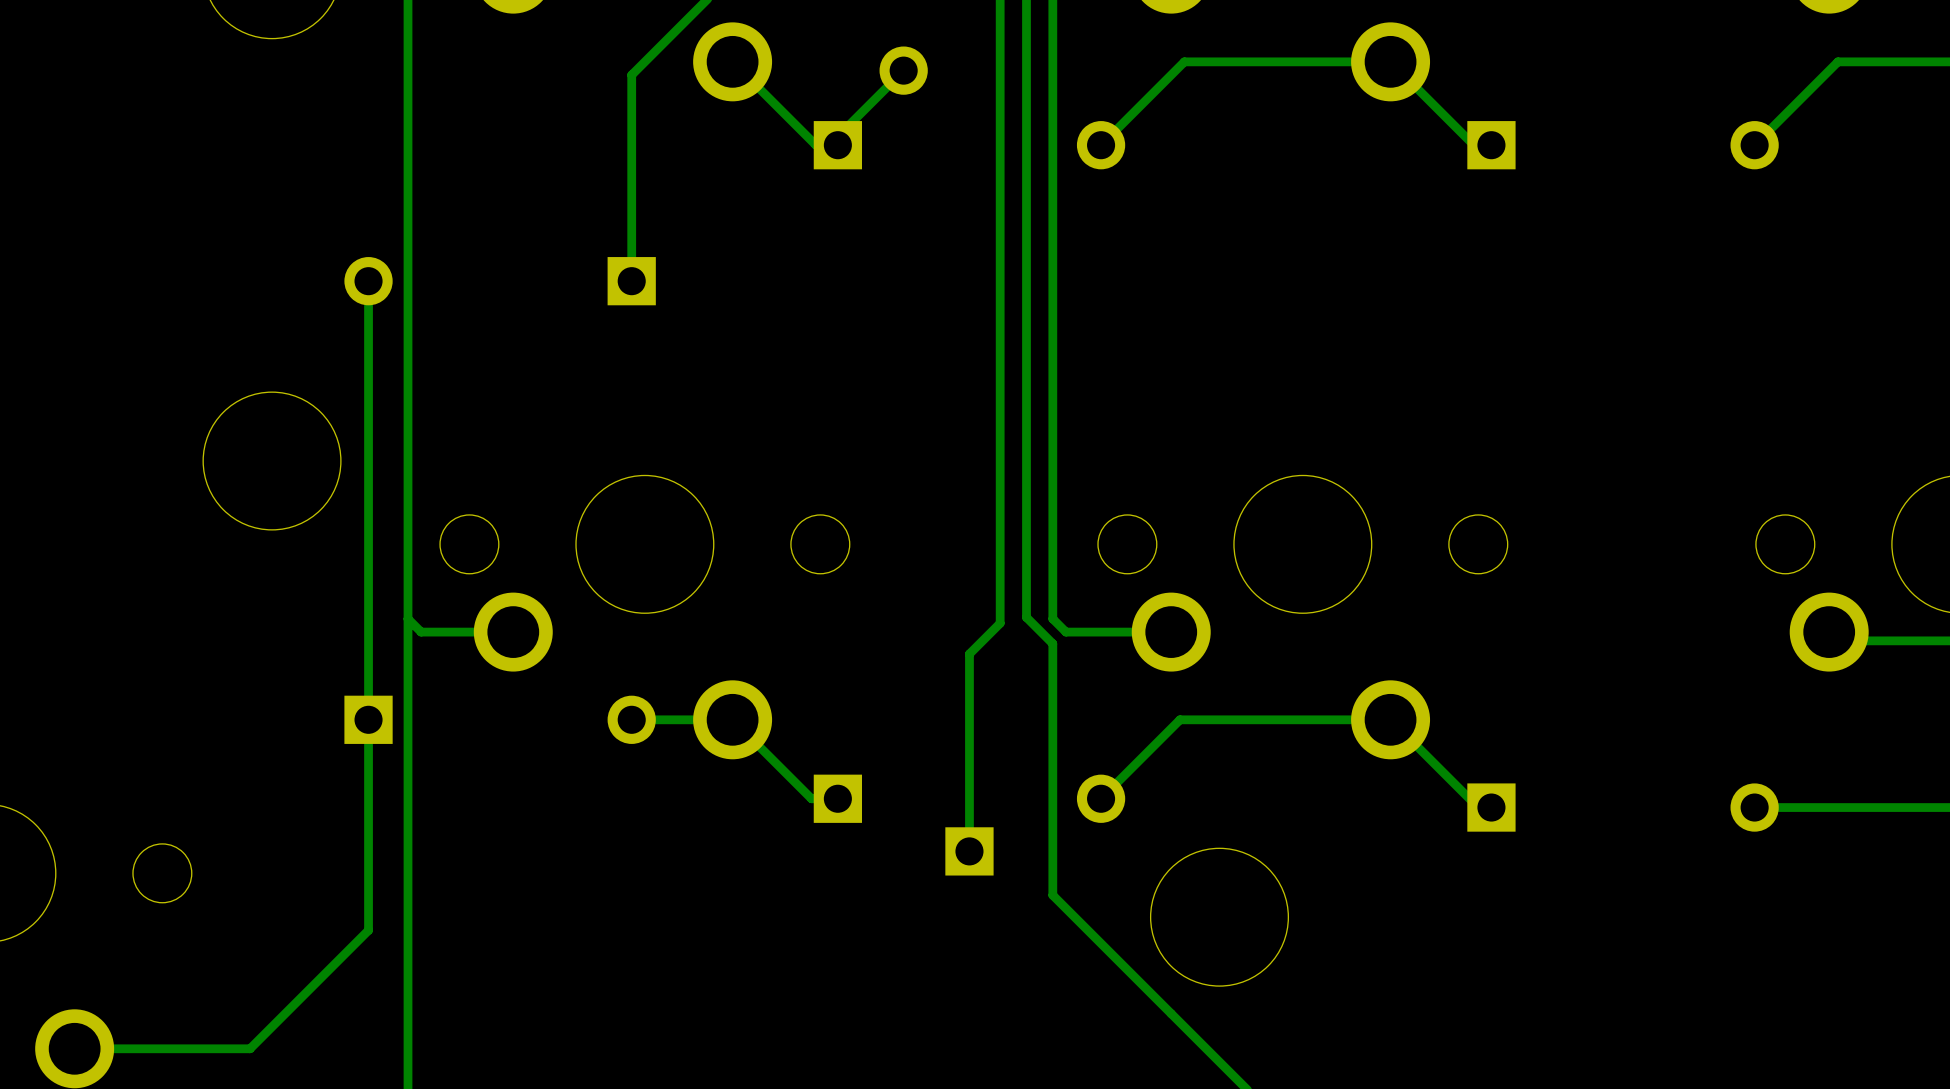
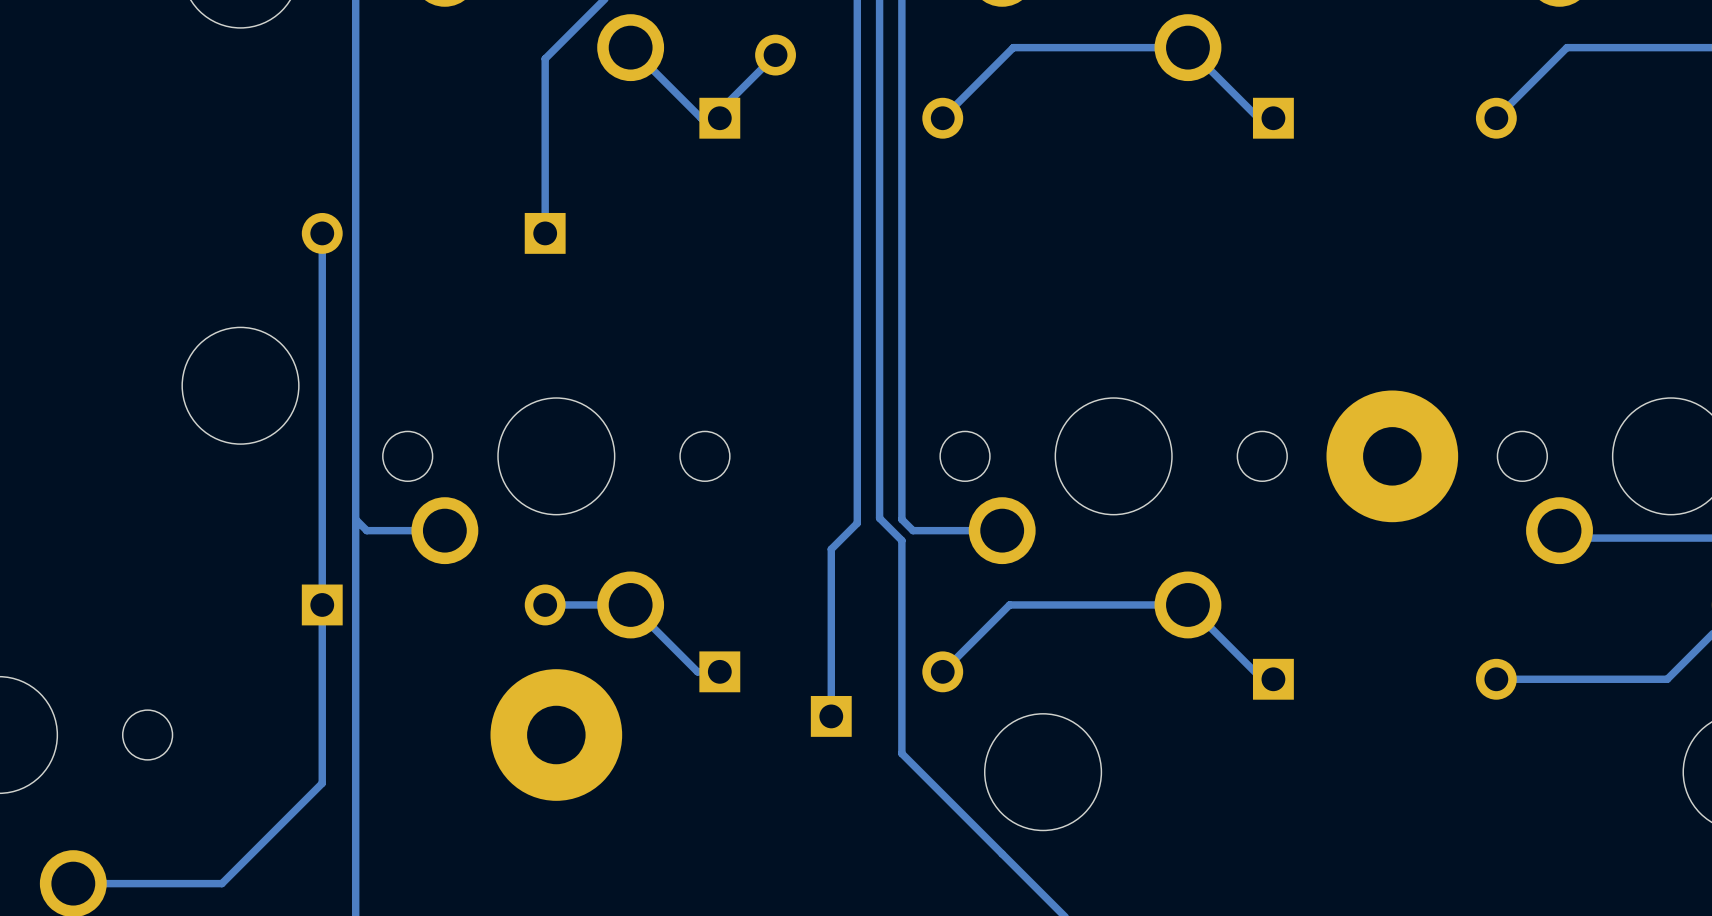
part: none -> (1392, 456)
part: none -> (556, 735)

